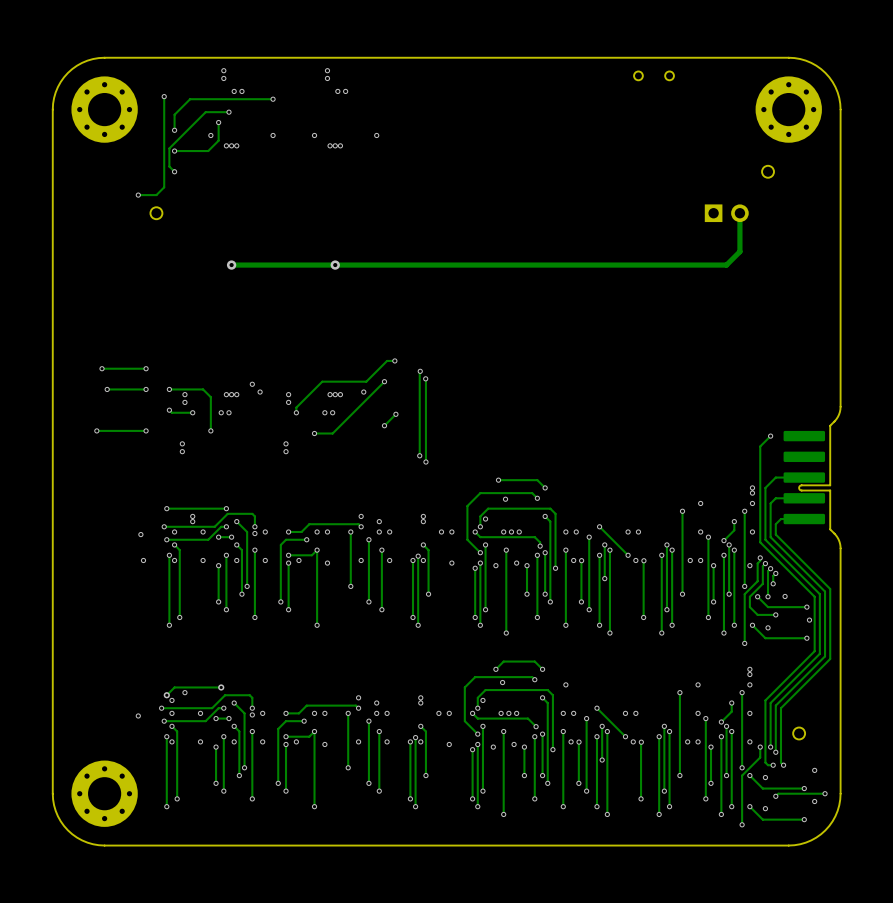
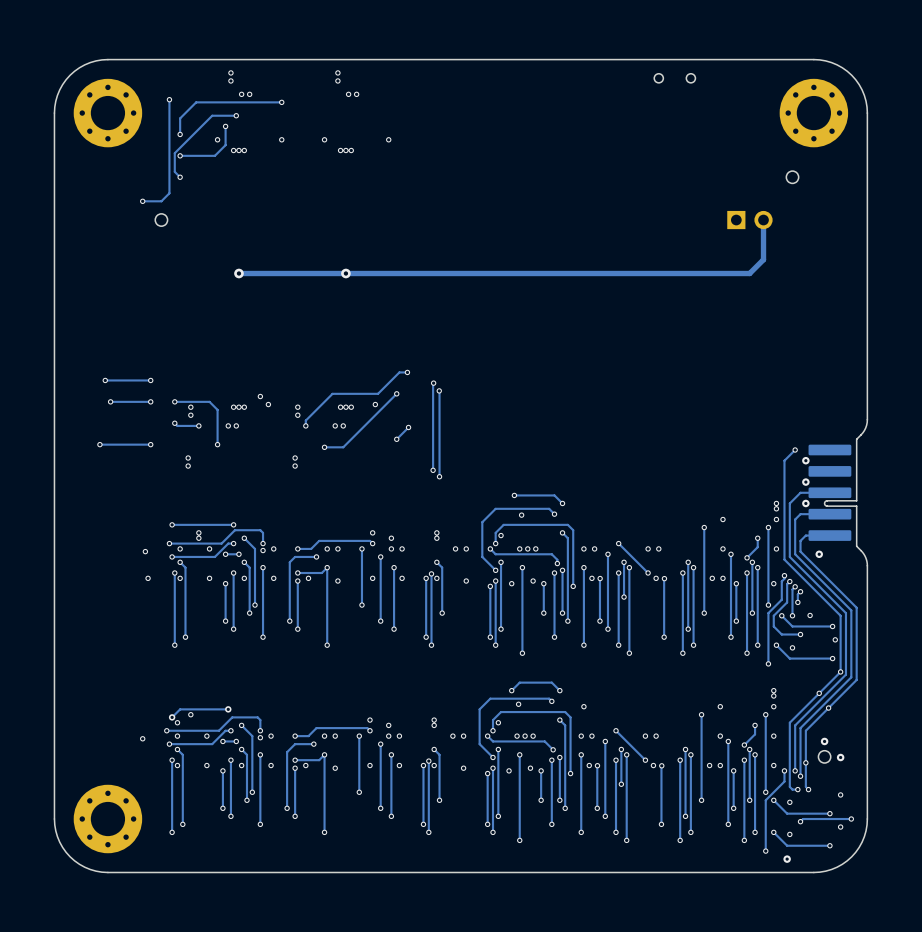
via: none -> (805, 460)
via: none -> (805, 482)
via: none -> (805, 503)
via: none -> (819, 554)
via: none -> (840, 671)
via: none -> (819, 693)
via: none -> (828, 708)
via: none -> (824, 741)
via: none -> (840, 757)
via: none -> (805, 762)
via: none -> (787, 859)

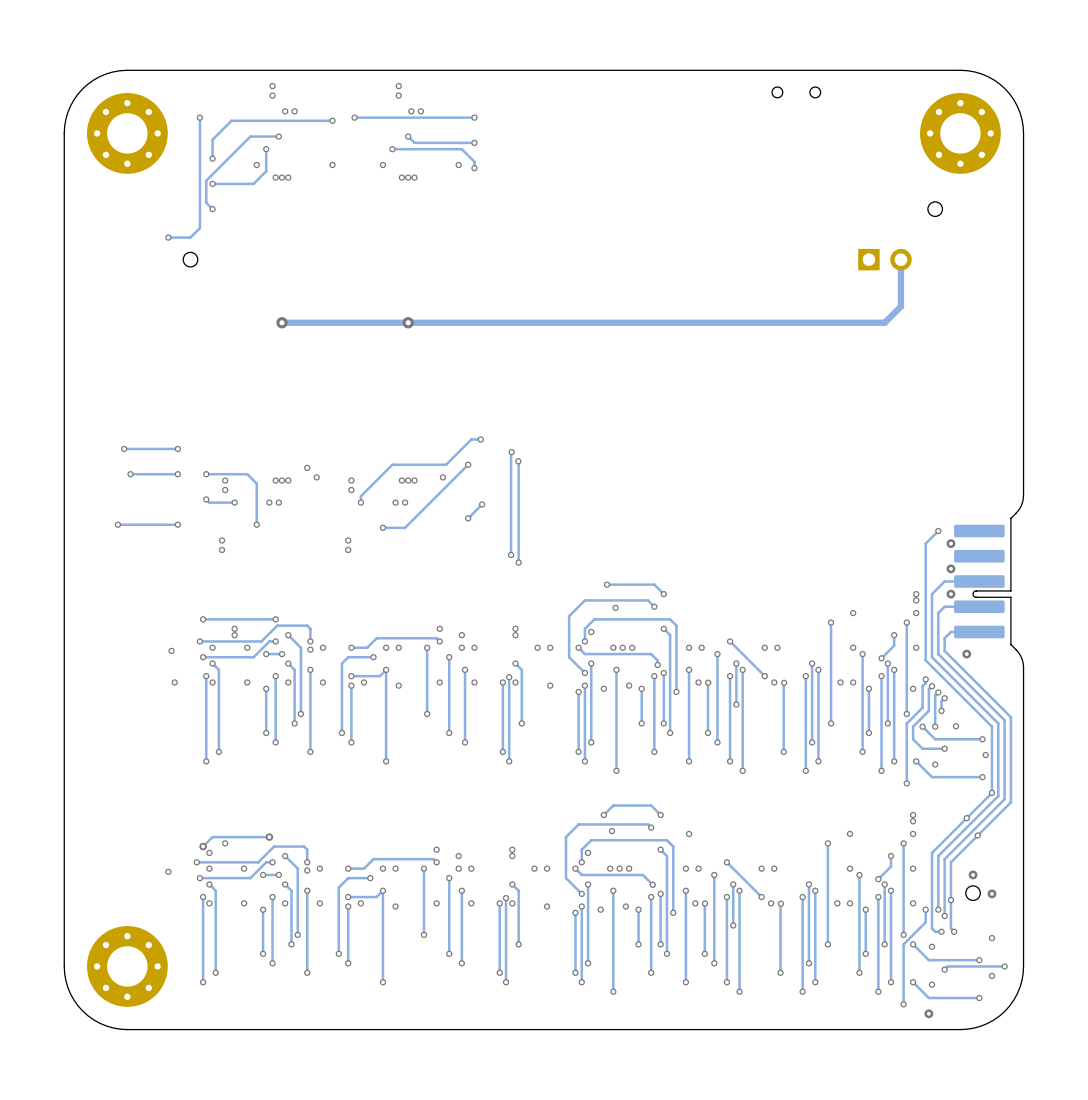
via: none -> (354, 117)
track: none -> (474, 117) (354, 117)
via: none -> (474, 117)
track: none -> (408, 136) (414, 142) (474, 142)
via: none -> (408, 136)
via: none -> (474, 142)
track: none -> (392, 149) (461, 149) (474, 161) (474, 168)
via: none -> (392, 149)
via: none -> (474, 168)

